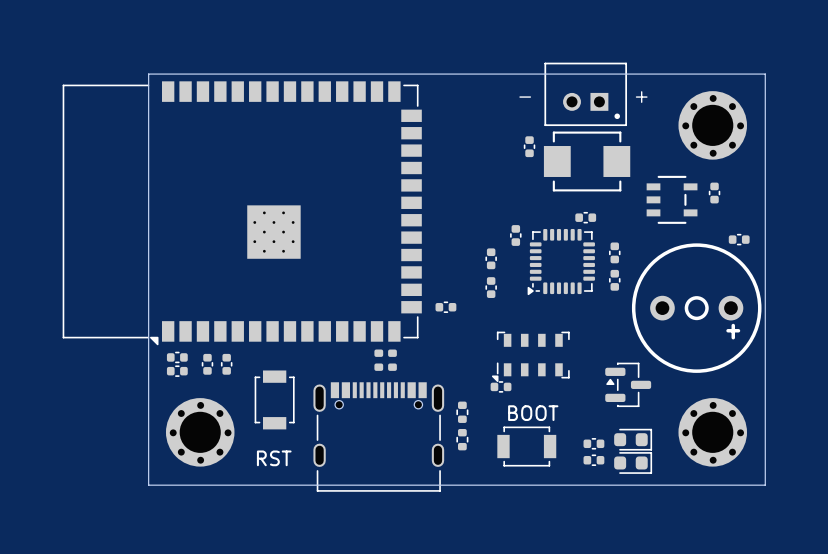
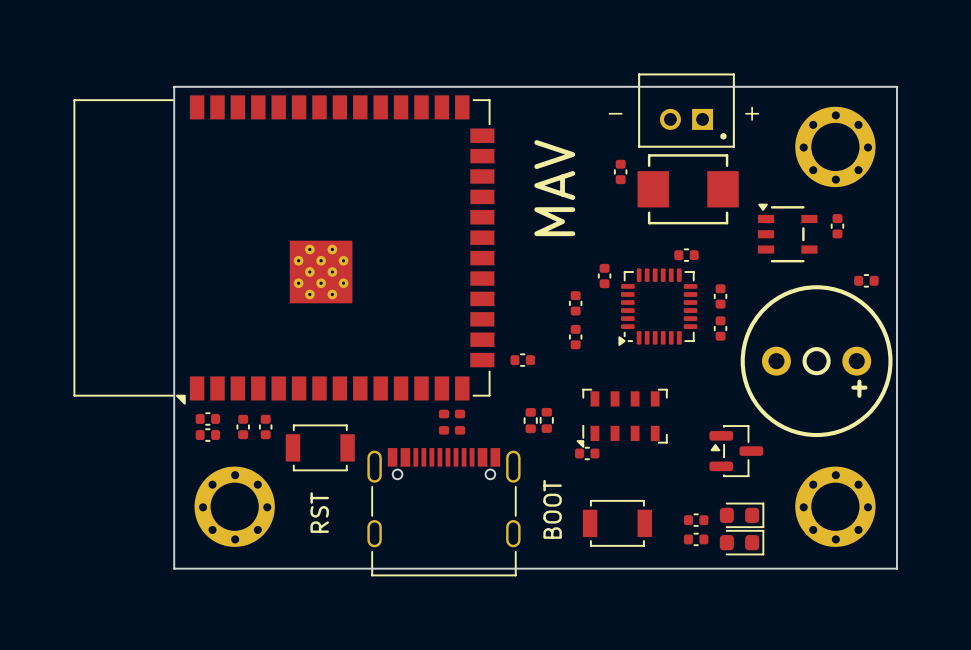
text: none -> MAV (554, 188)
drawing: none -> [758, 203, 768, 211]
part: none -> (530, 420)
part: none -> (546, 420)
part rotation: 0° (274, 399) -> 90° clockwise (320, 447)
part: (462, 412) -> none
text rotation: 0° (533, 413) -> 90° counterclockwise (552, 509)
part: (462, 439) -> none
text rotation: 0° (274, 458) -> 90° counterclockwise (319, 512)

